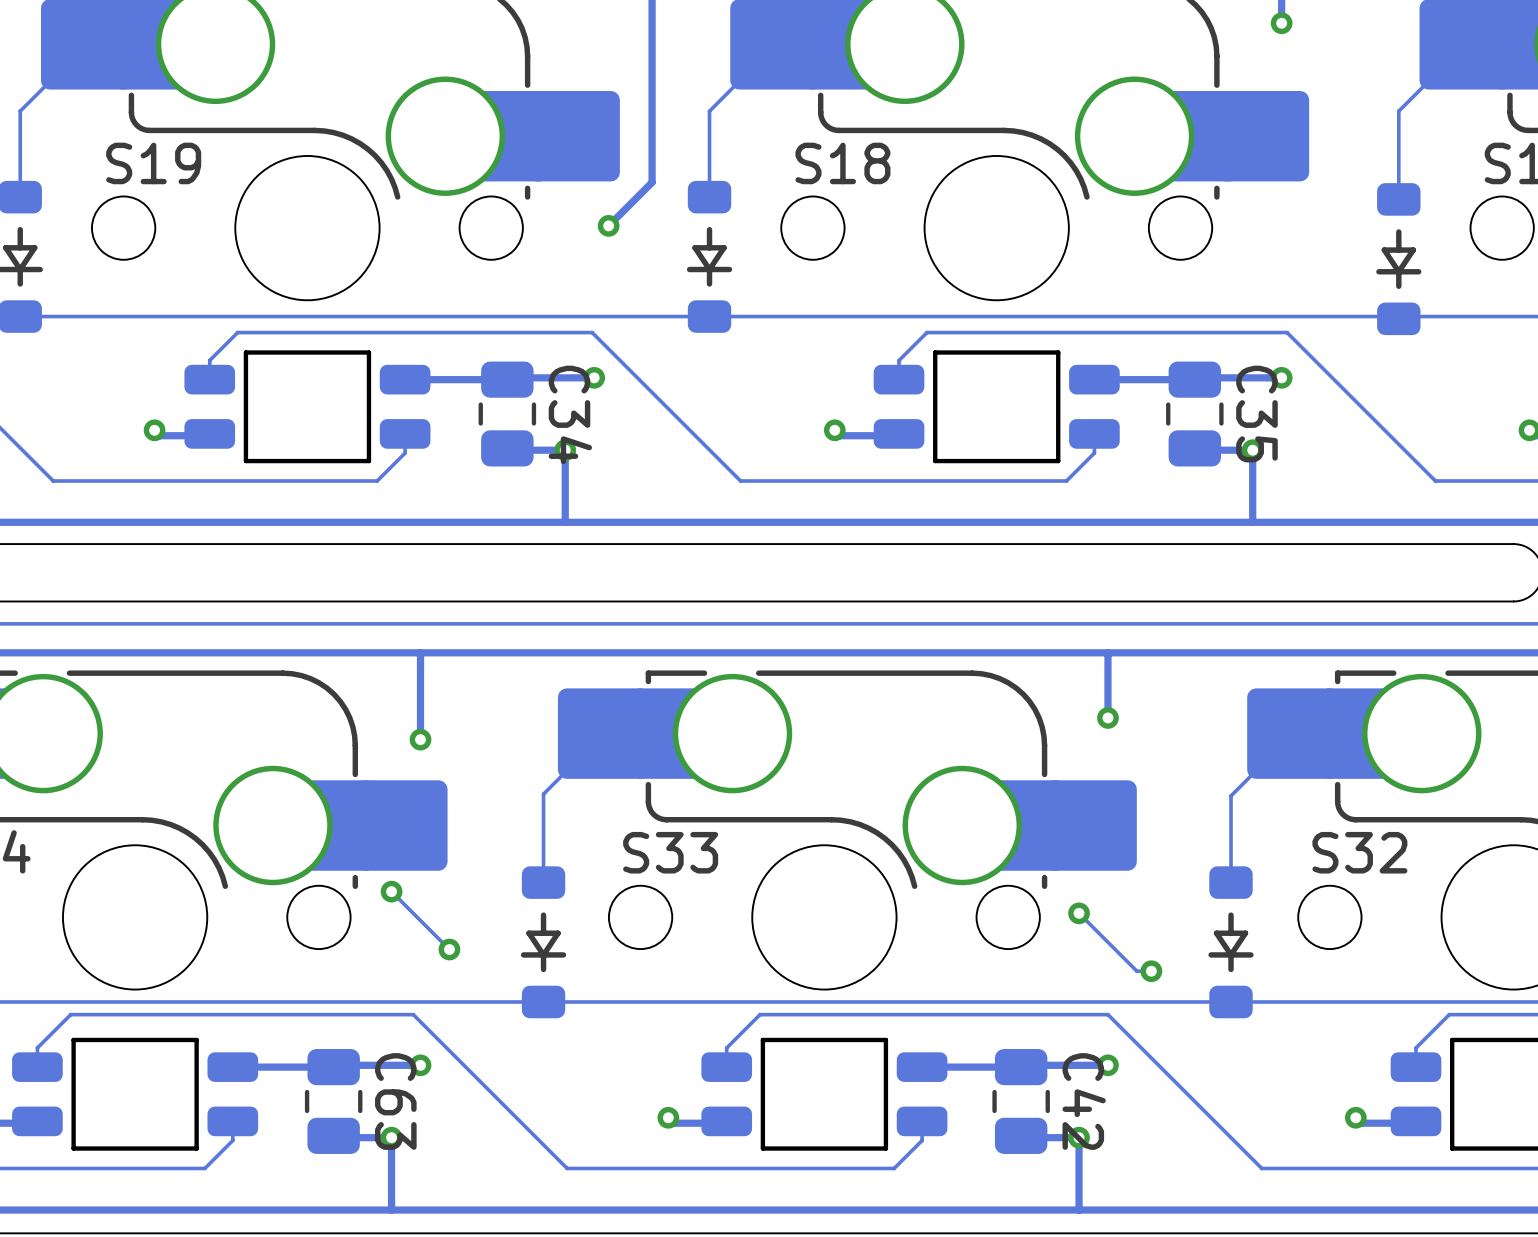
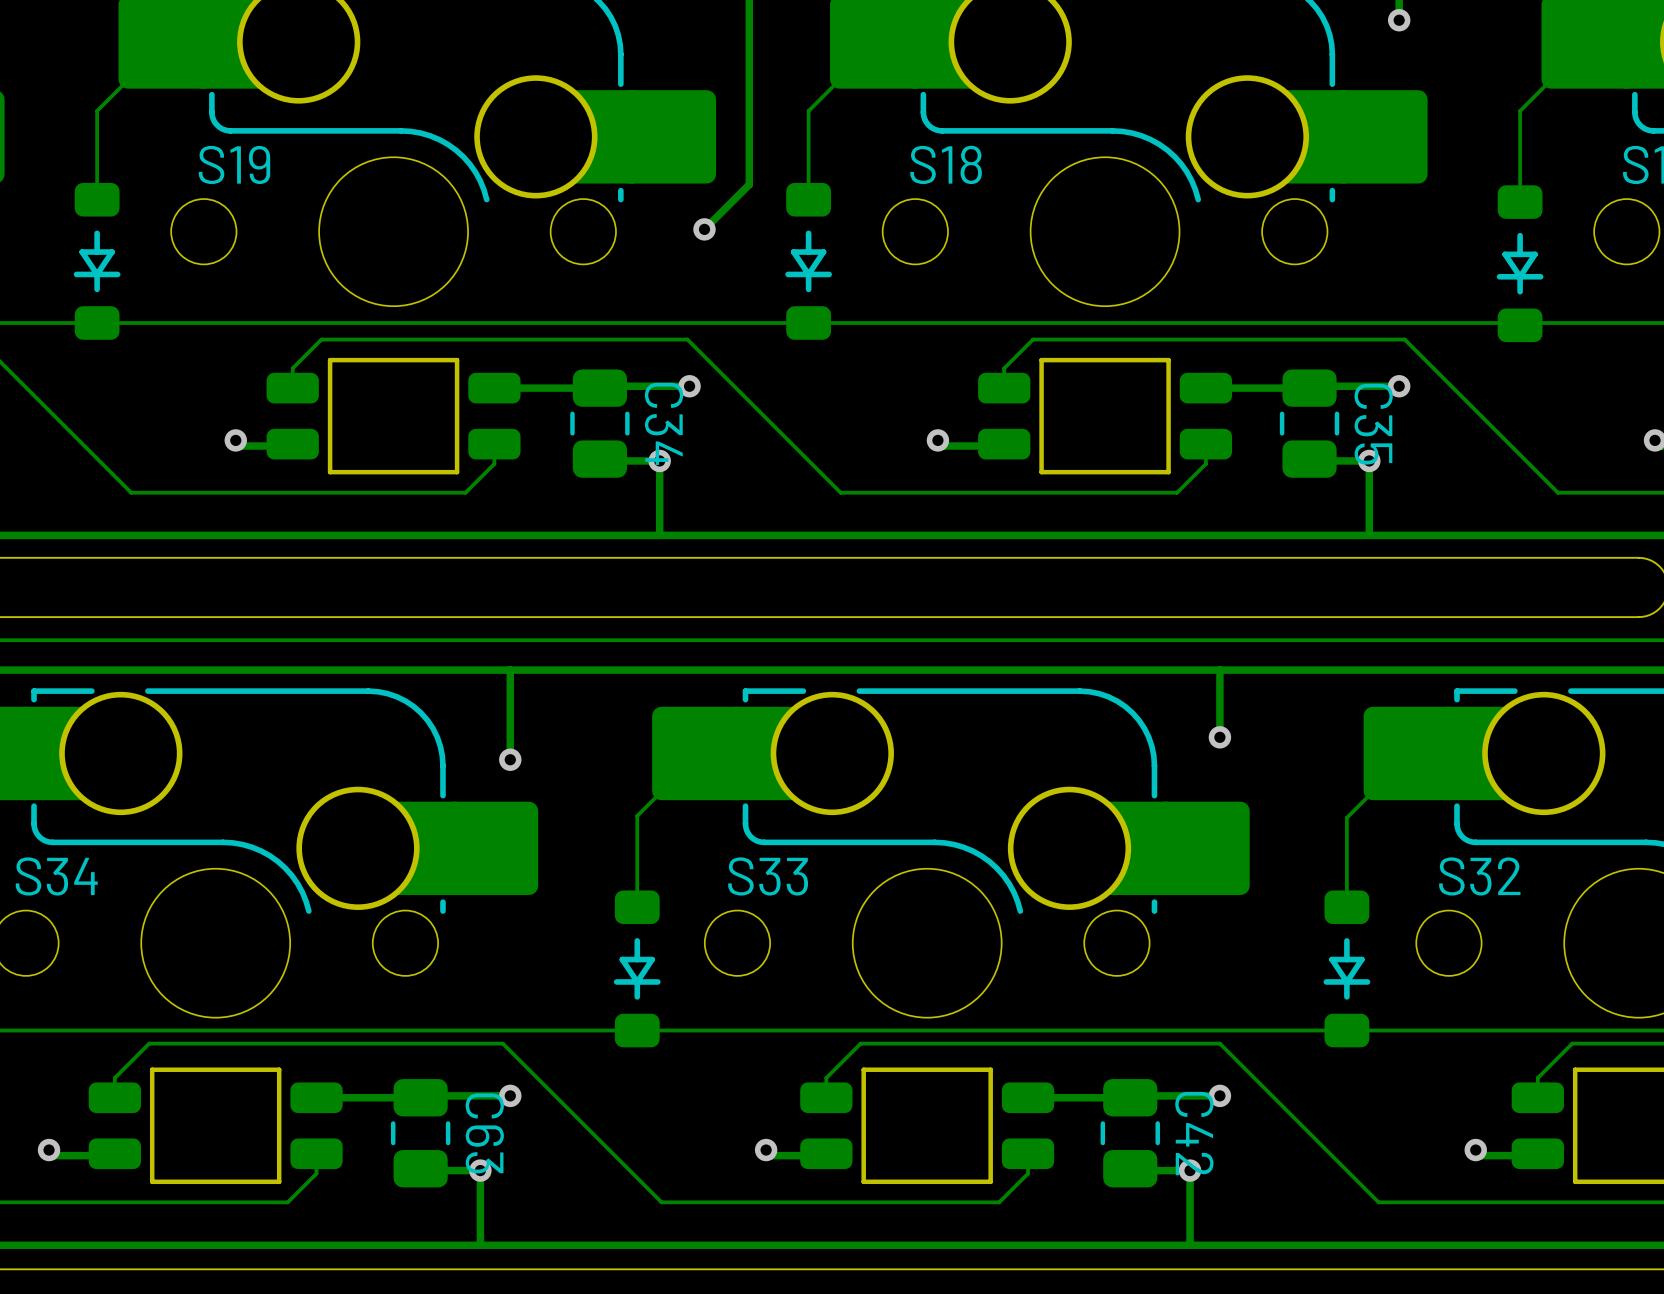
track: (391, 891) (449, 949) -> none
via: (391, 891) -> none
track: (1079, 913) (1136, 971) (1151, 971) -> none
via: (1079, 913) -> none
via: (449, 949) -> none
via: (1151, 971) -> none

